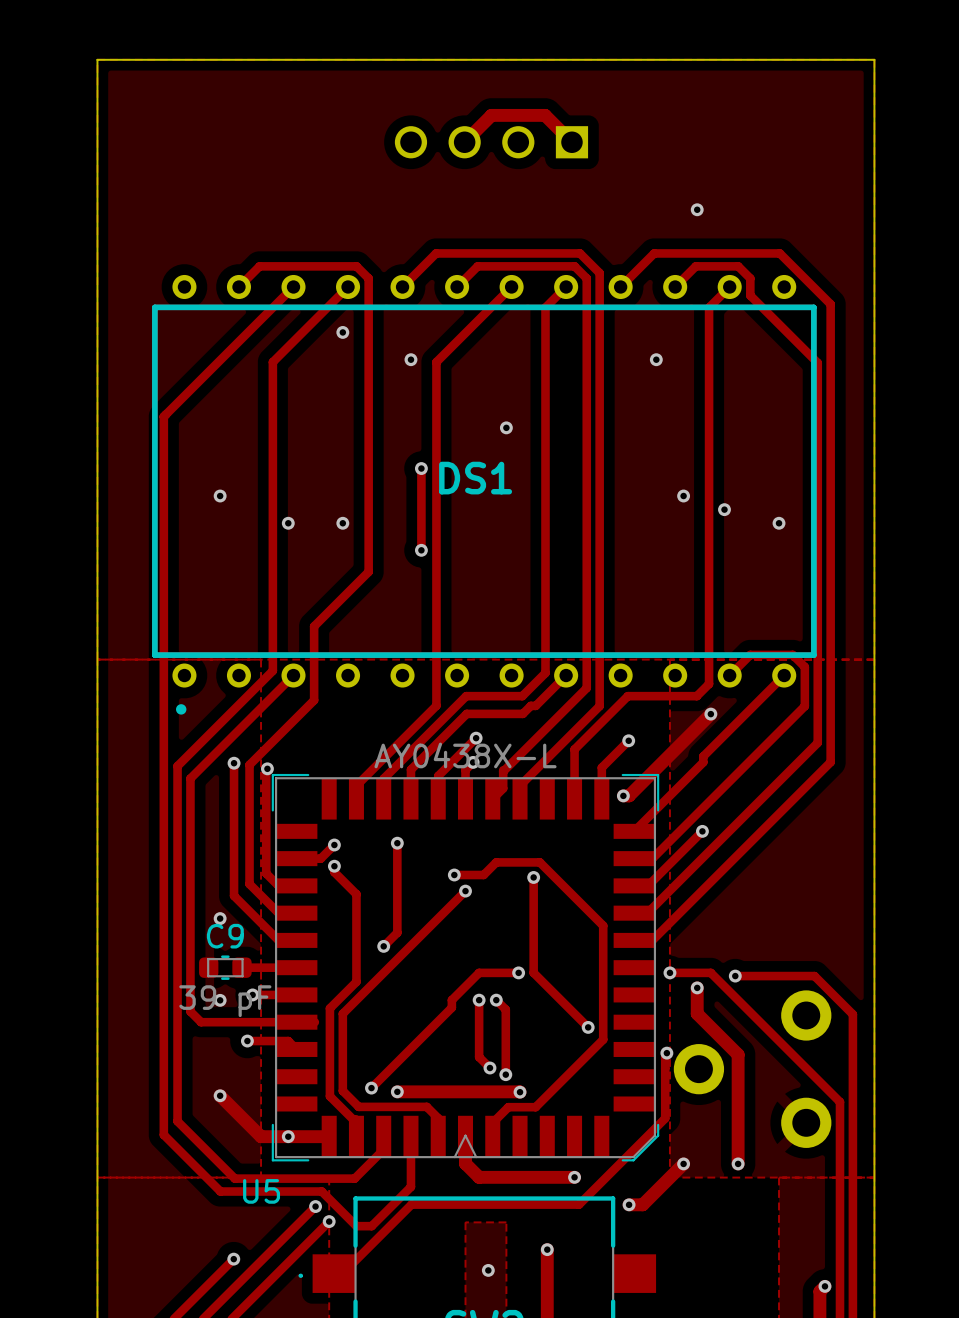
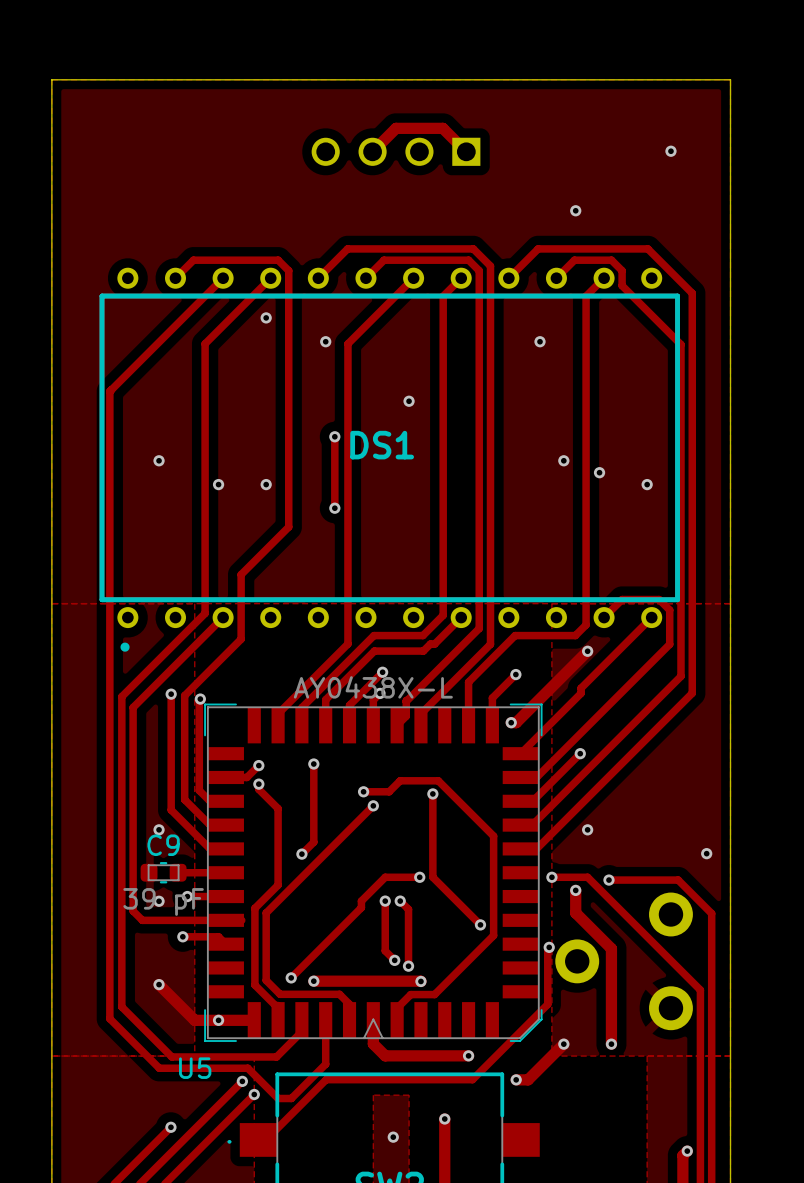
via: none -> (670, 151)
via: none -> (587, 829)
via: none -> (706, 853)

